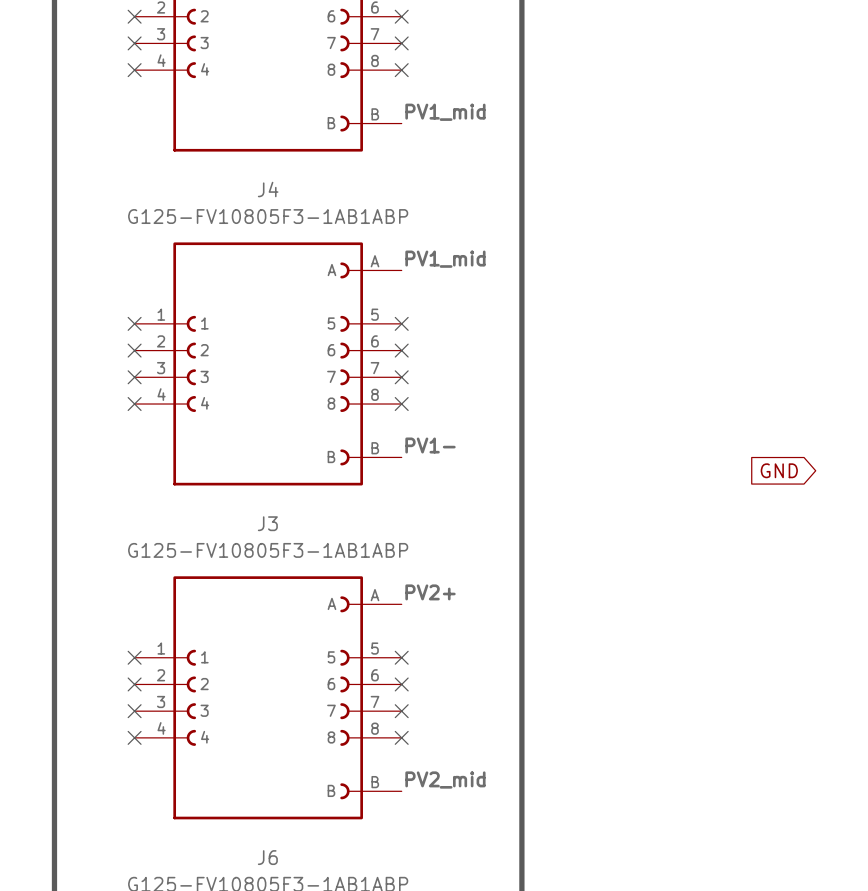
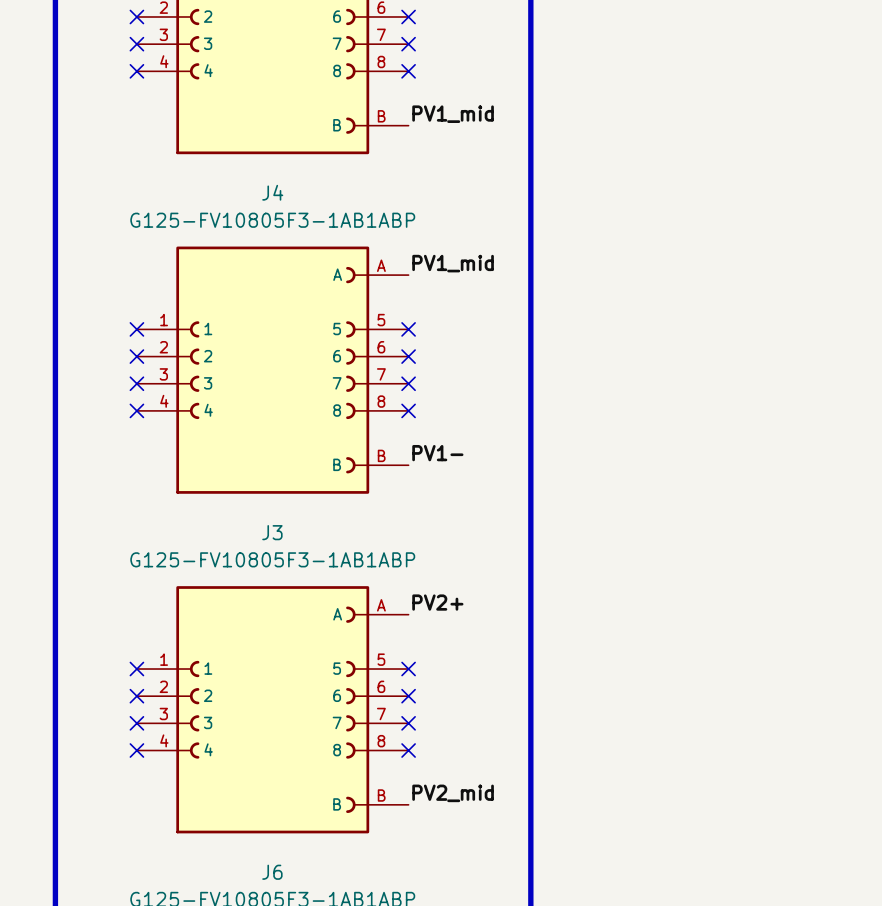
global label: GND (779, 470) -> none

